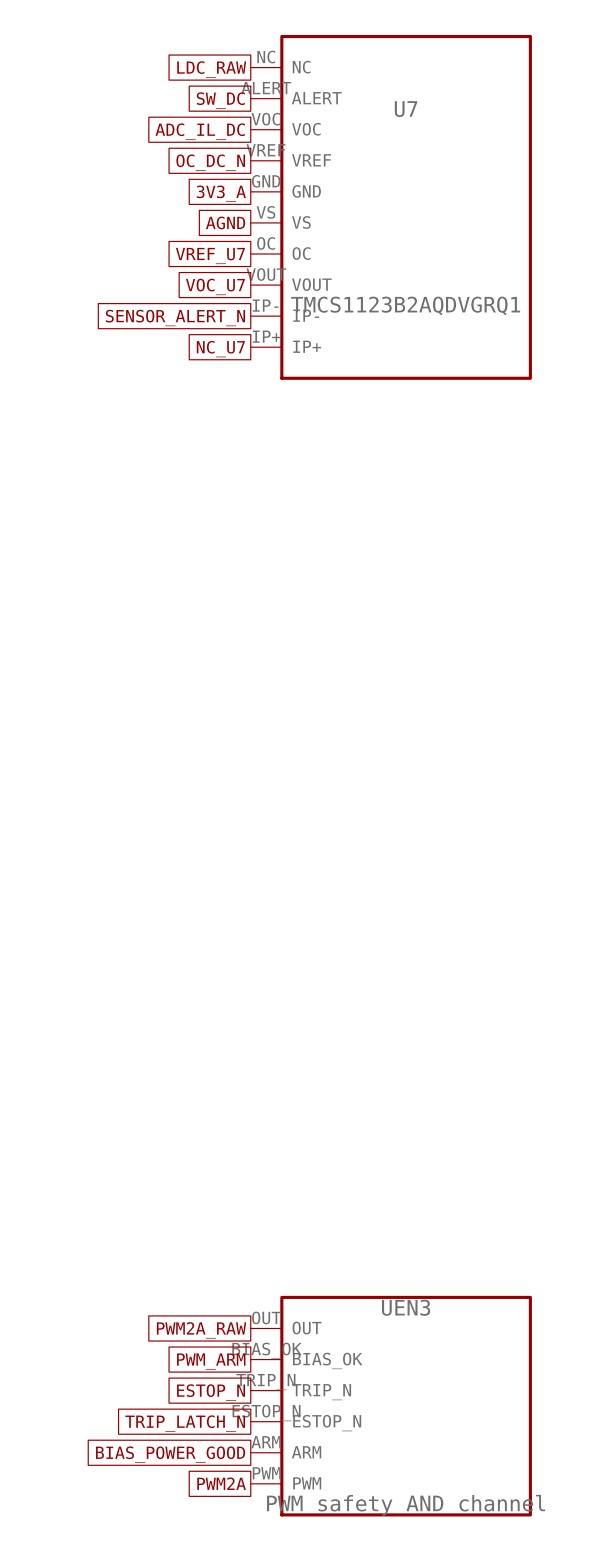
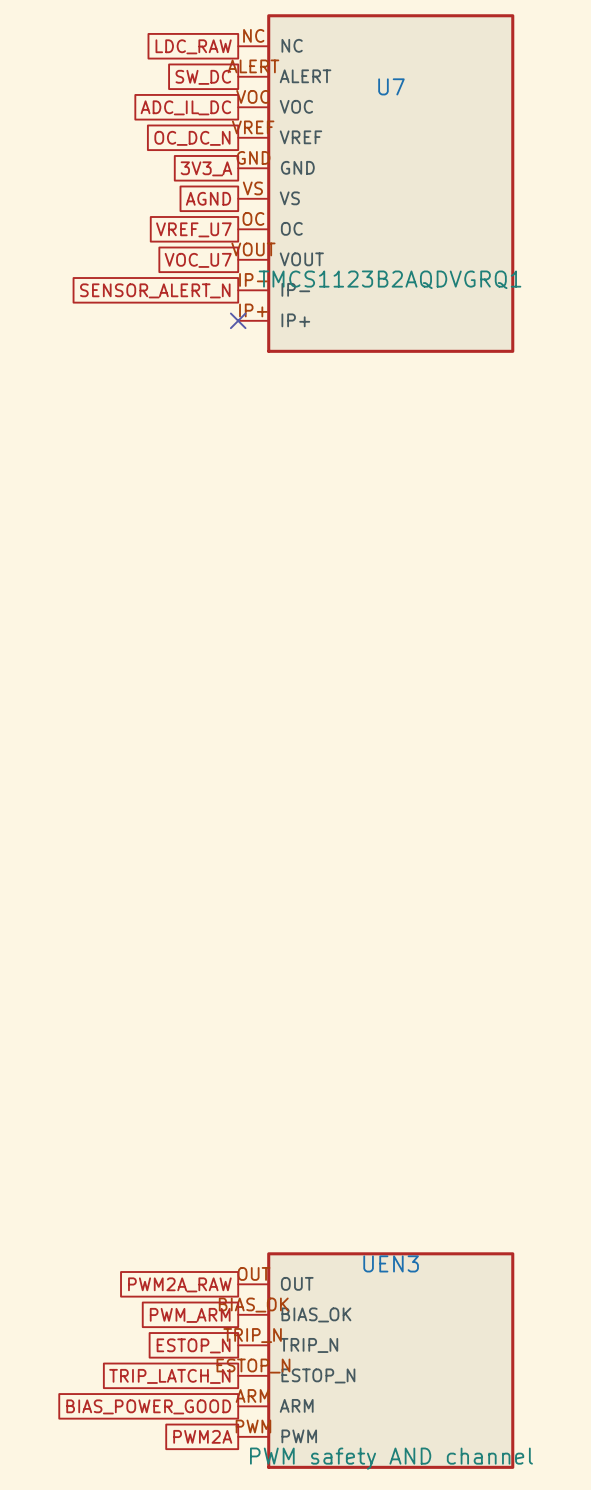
no-connect mark: none -> (238, 320)
global label: NC_U7 (220, 349) -> none

